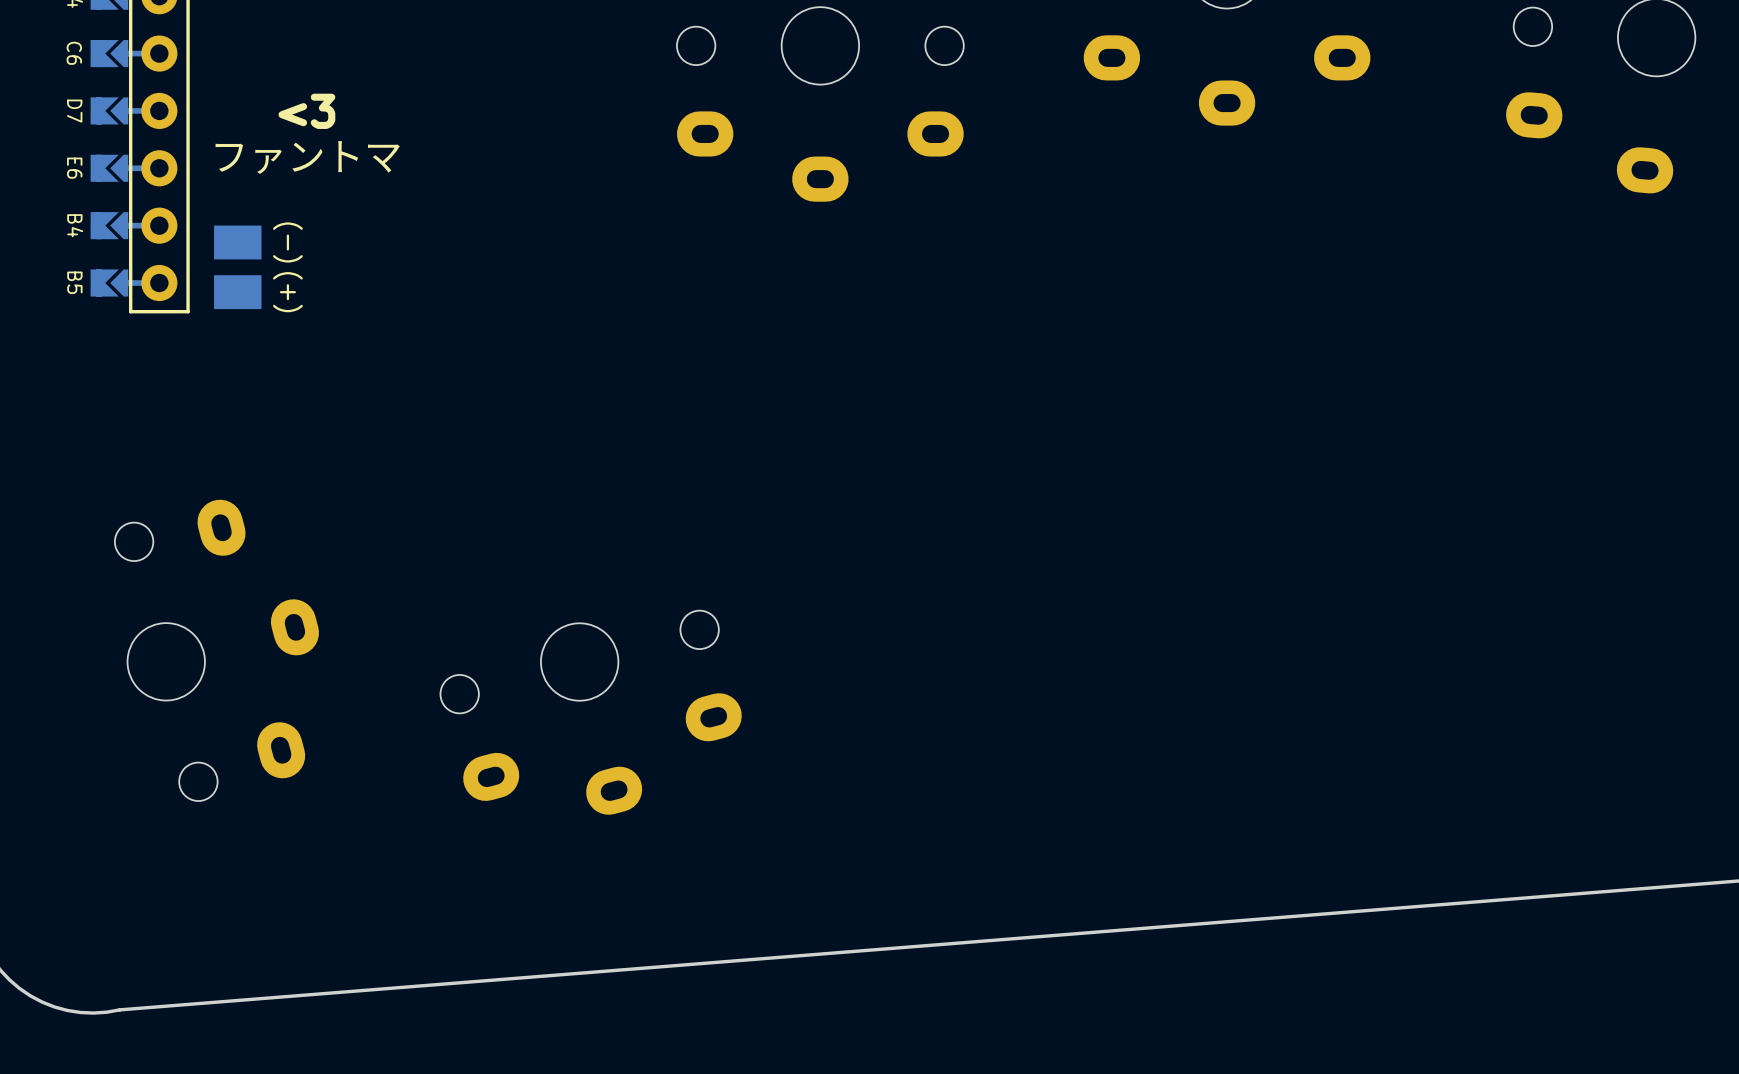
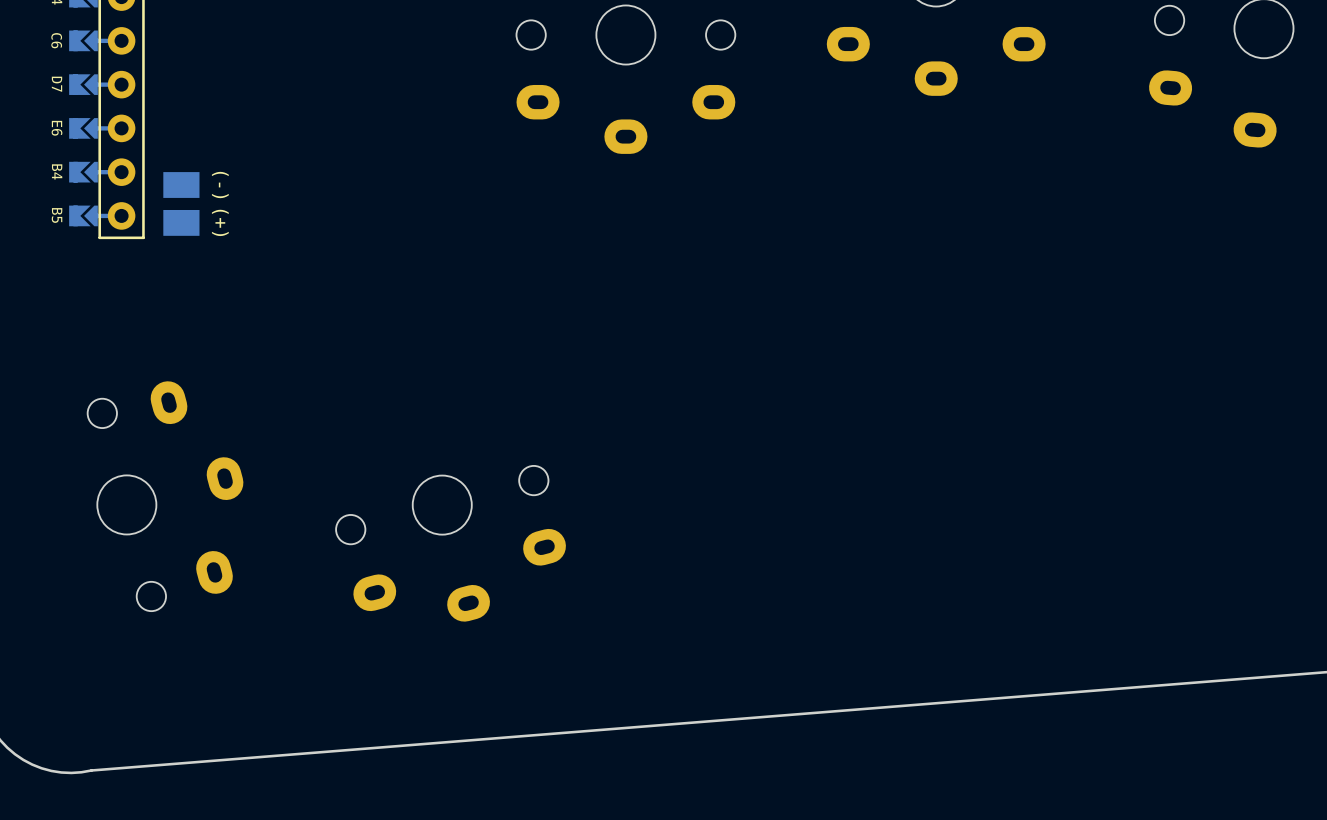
text: <3 (306, 111) -> none
text: ファントマ (307, 157) -> none

